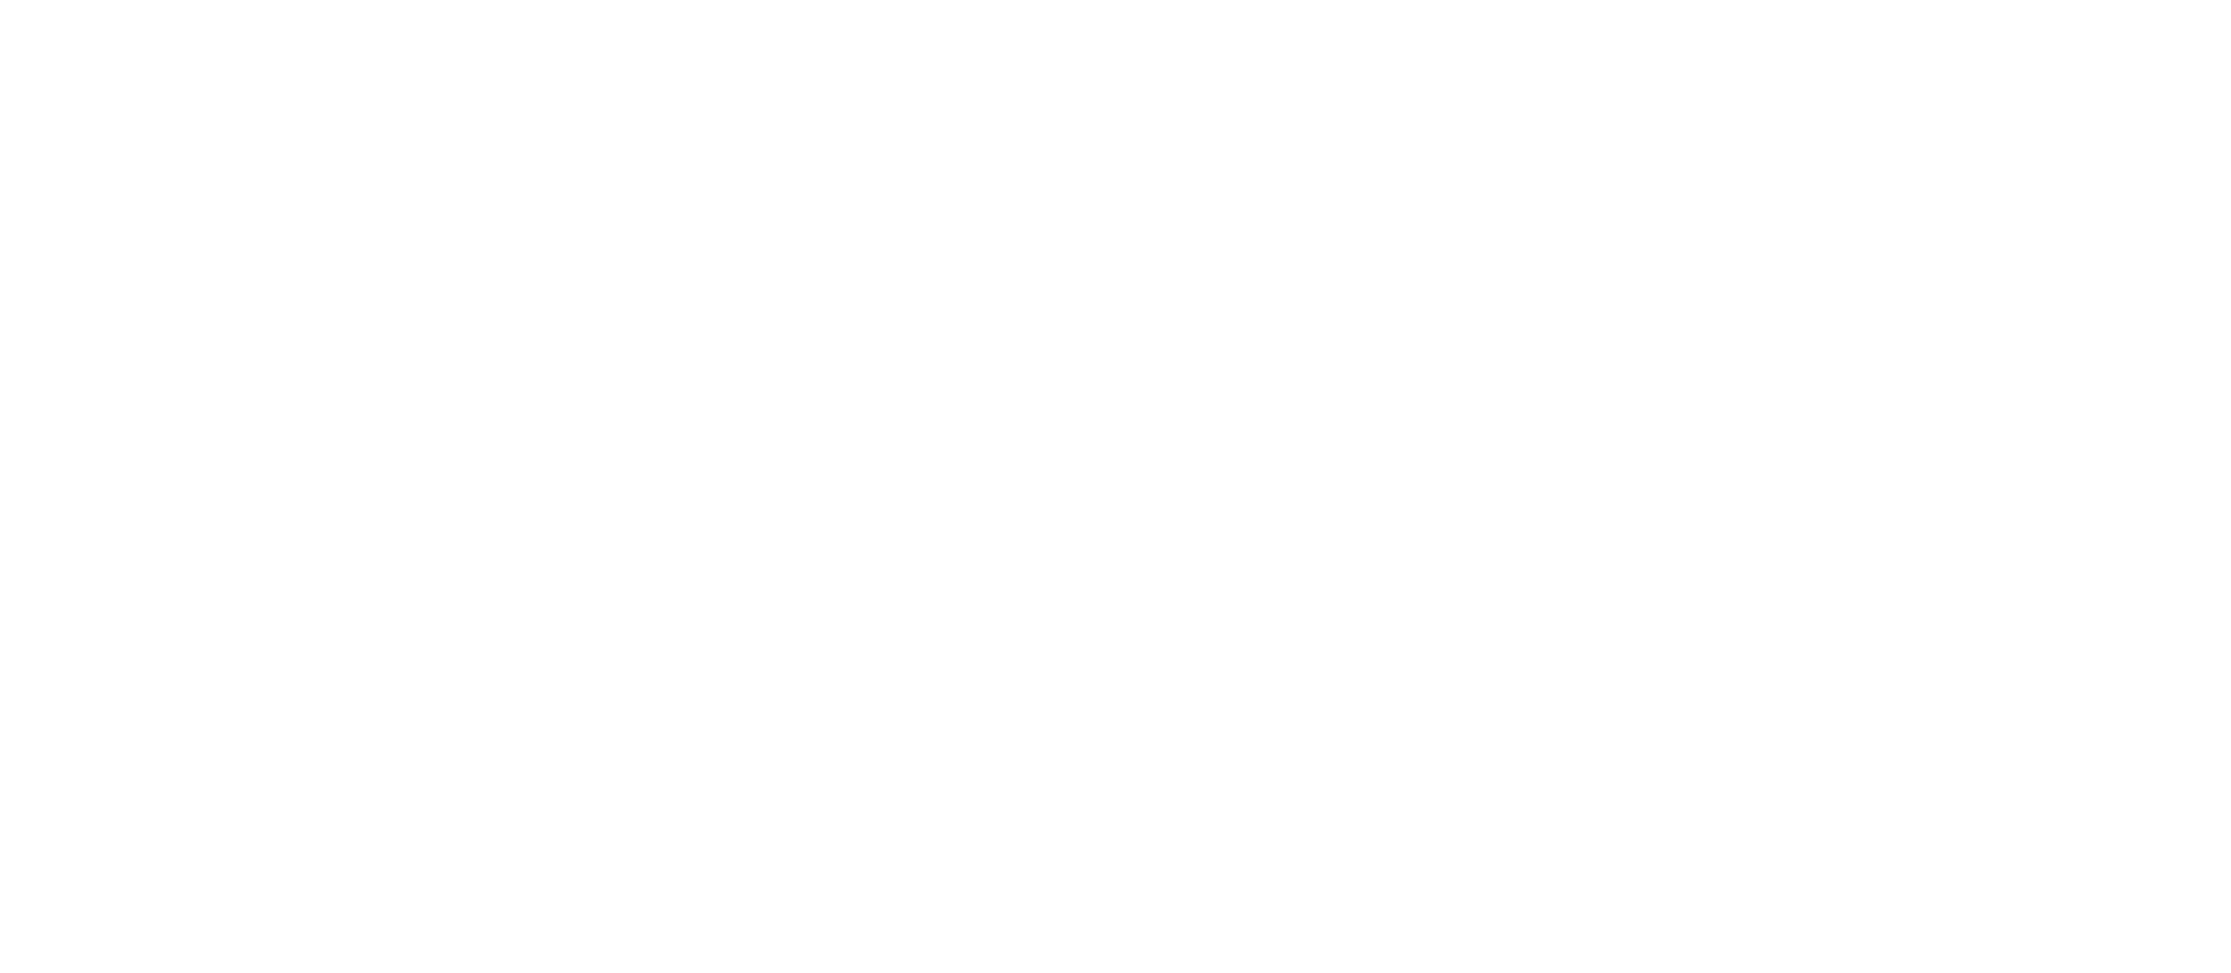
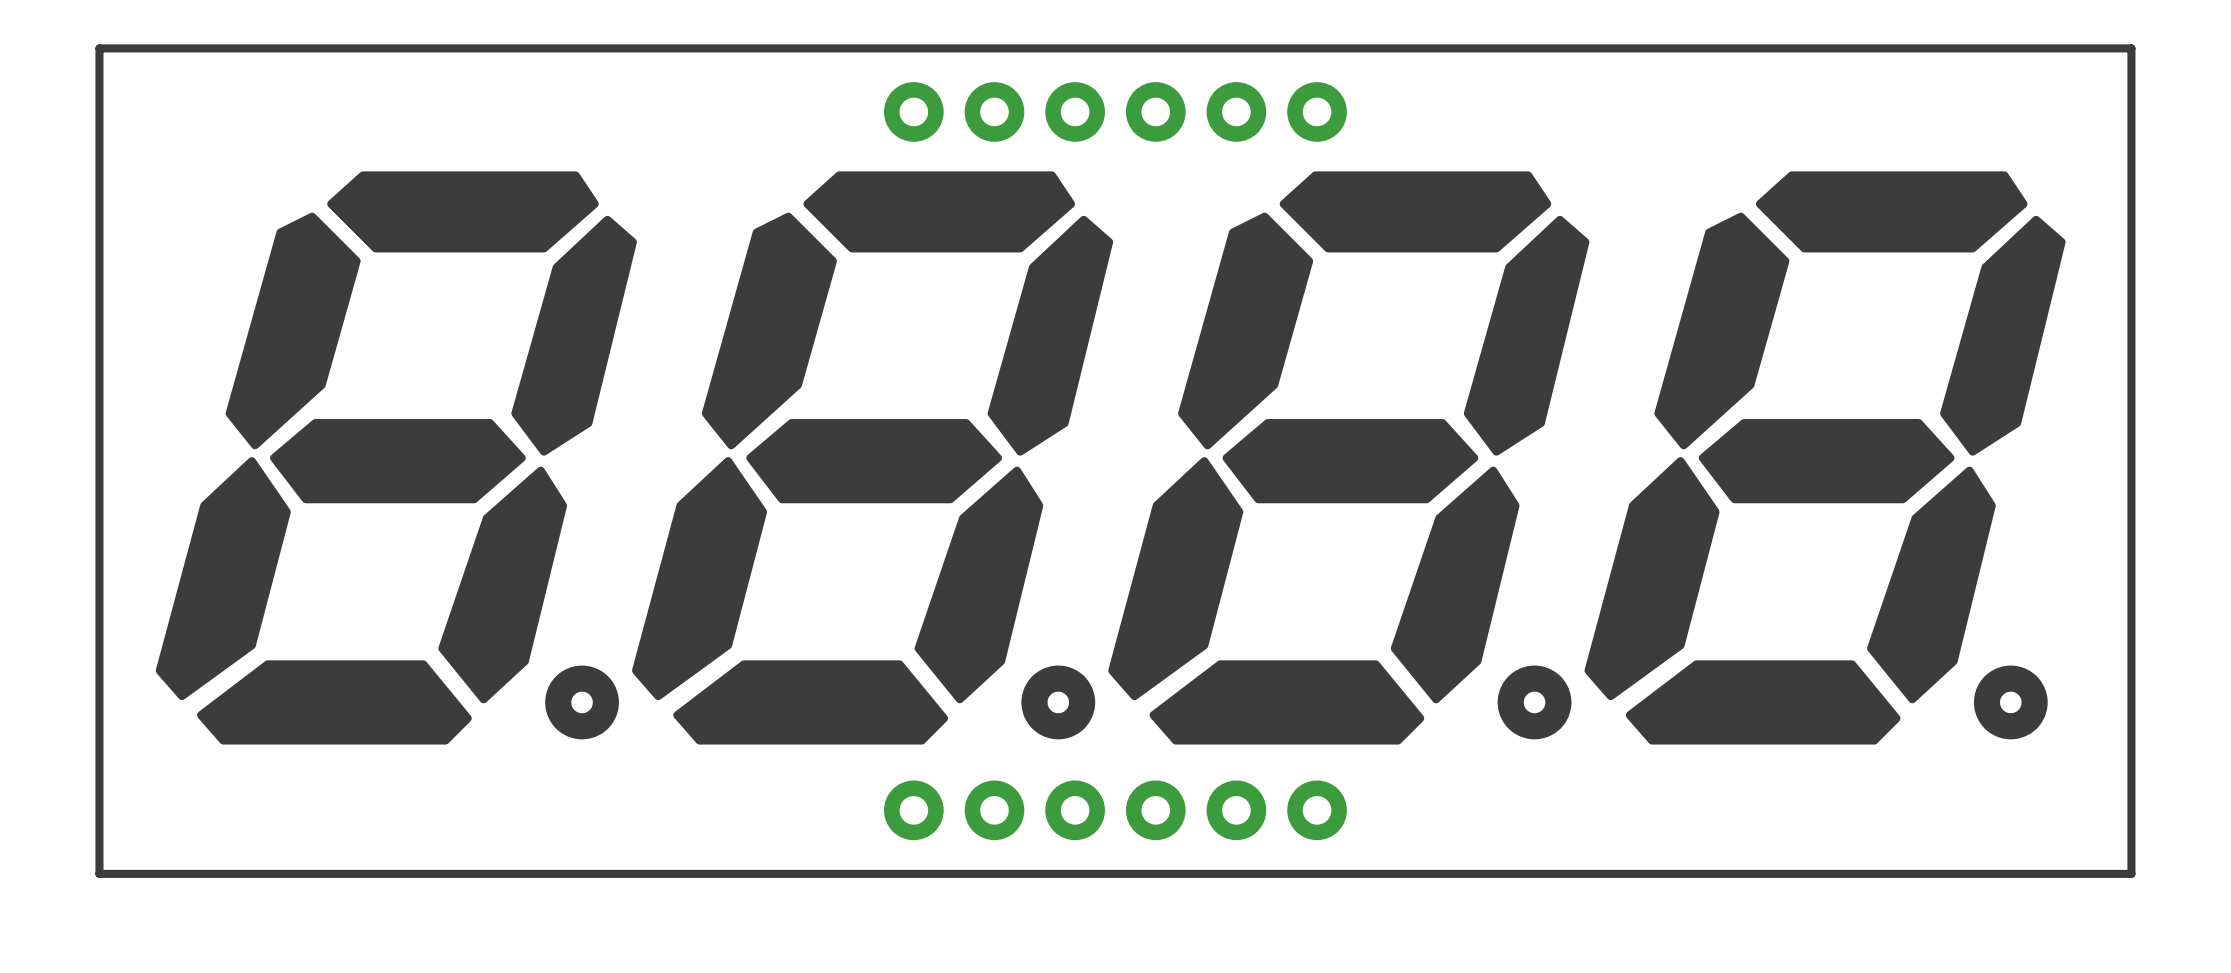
part: none -> (1115, 461)

